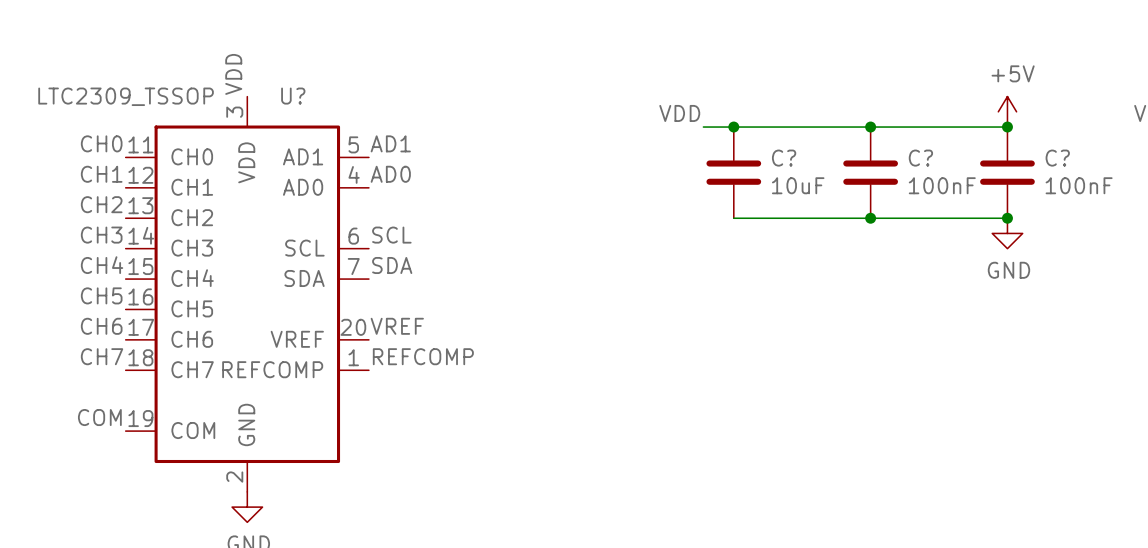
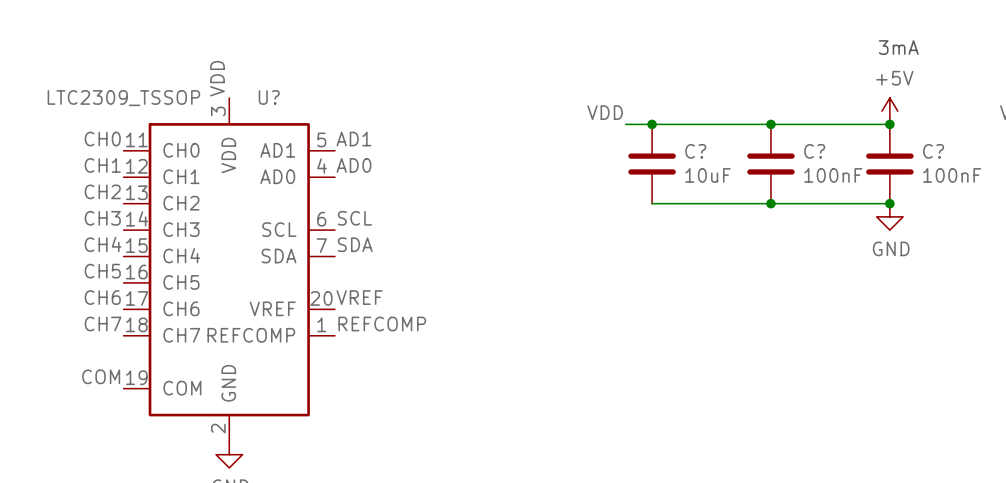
text: none -> 3mA (898, 47)

